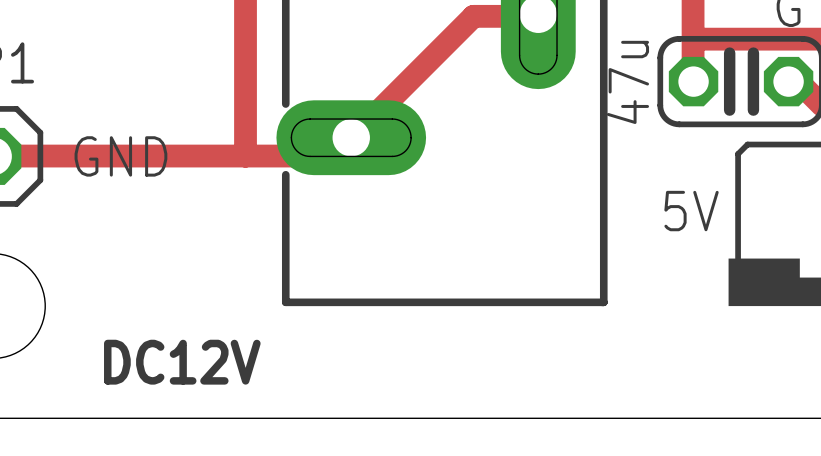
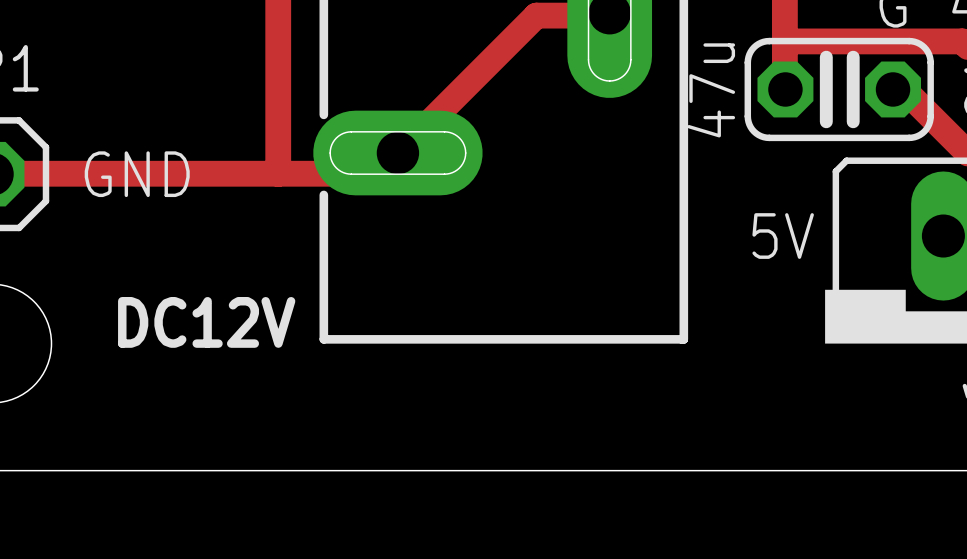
DC12V name position: DC12V (182, 362) -> DC12V (206, 322)

